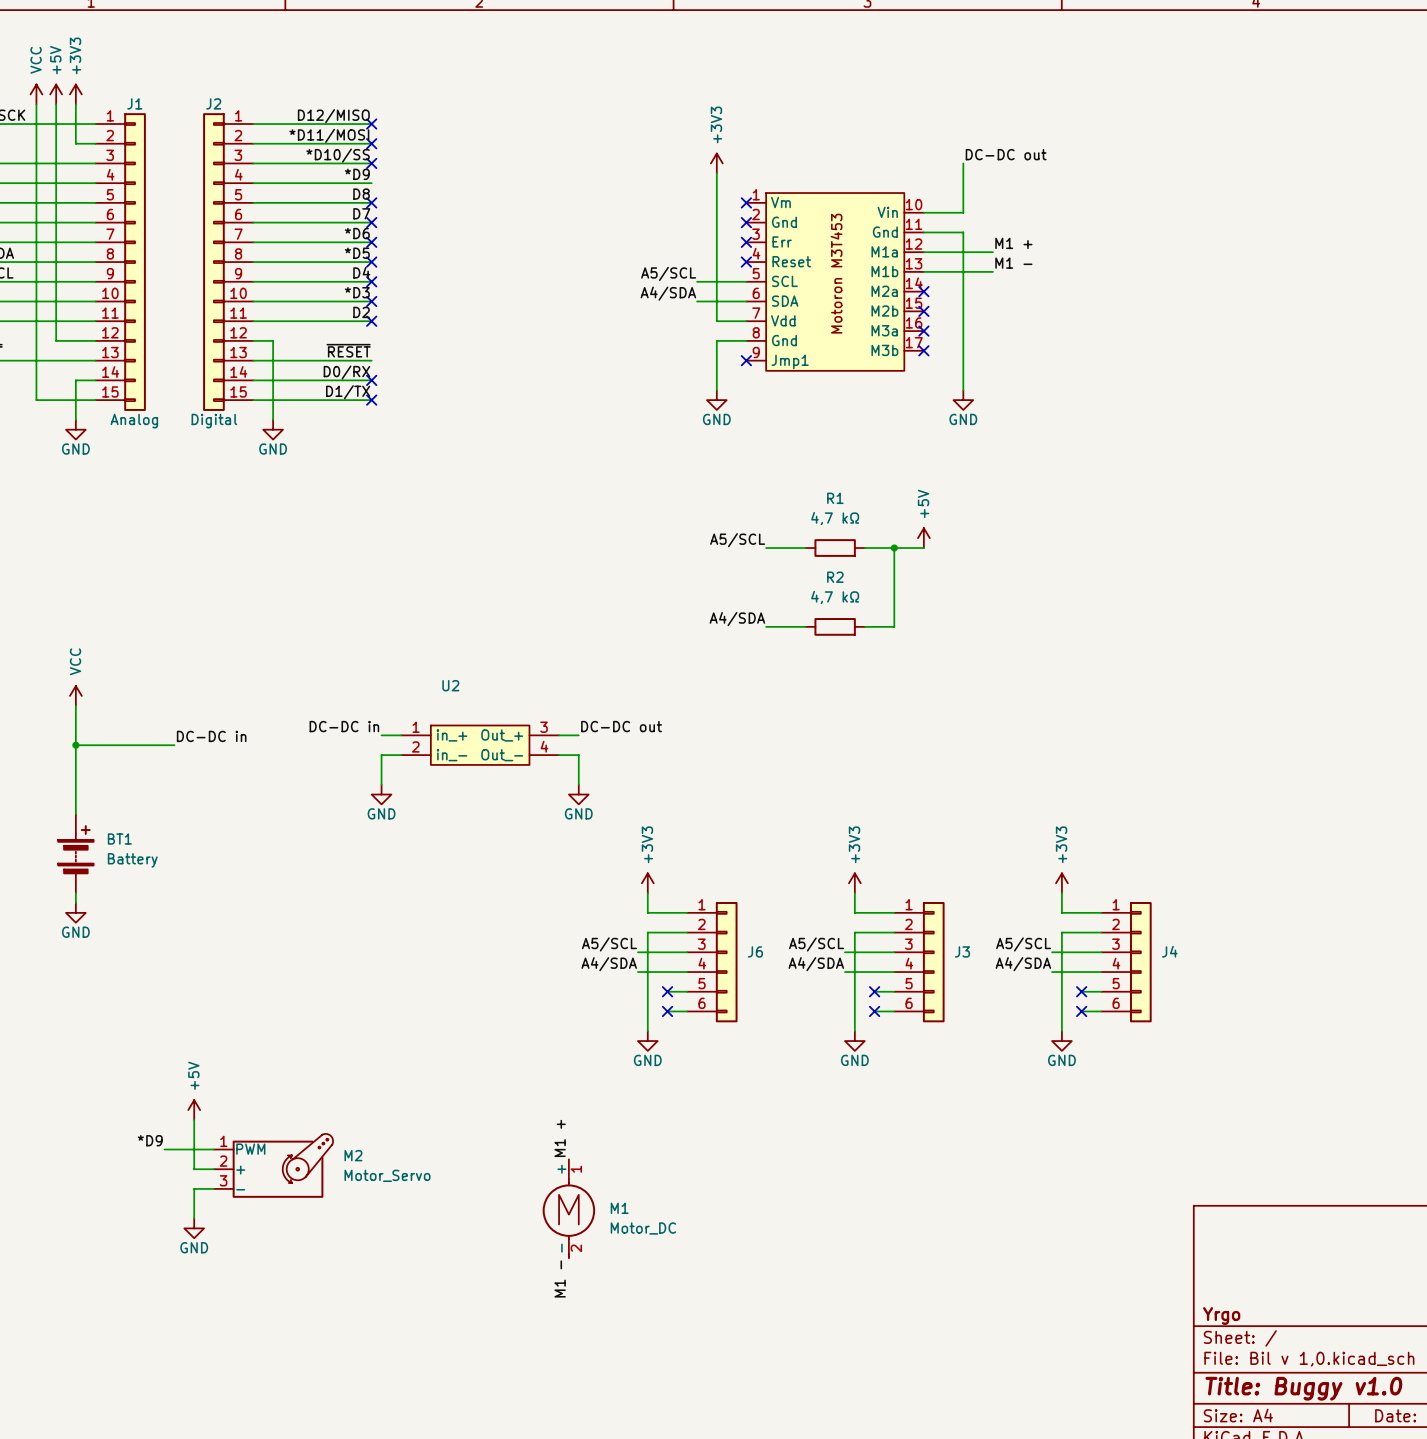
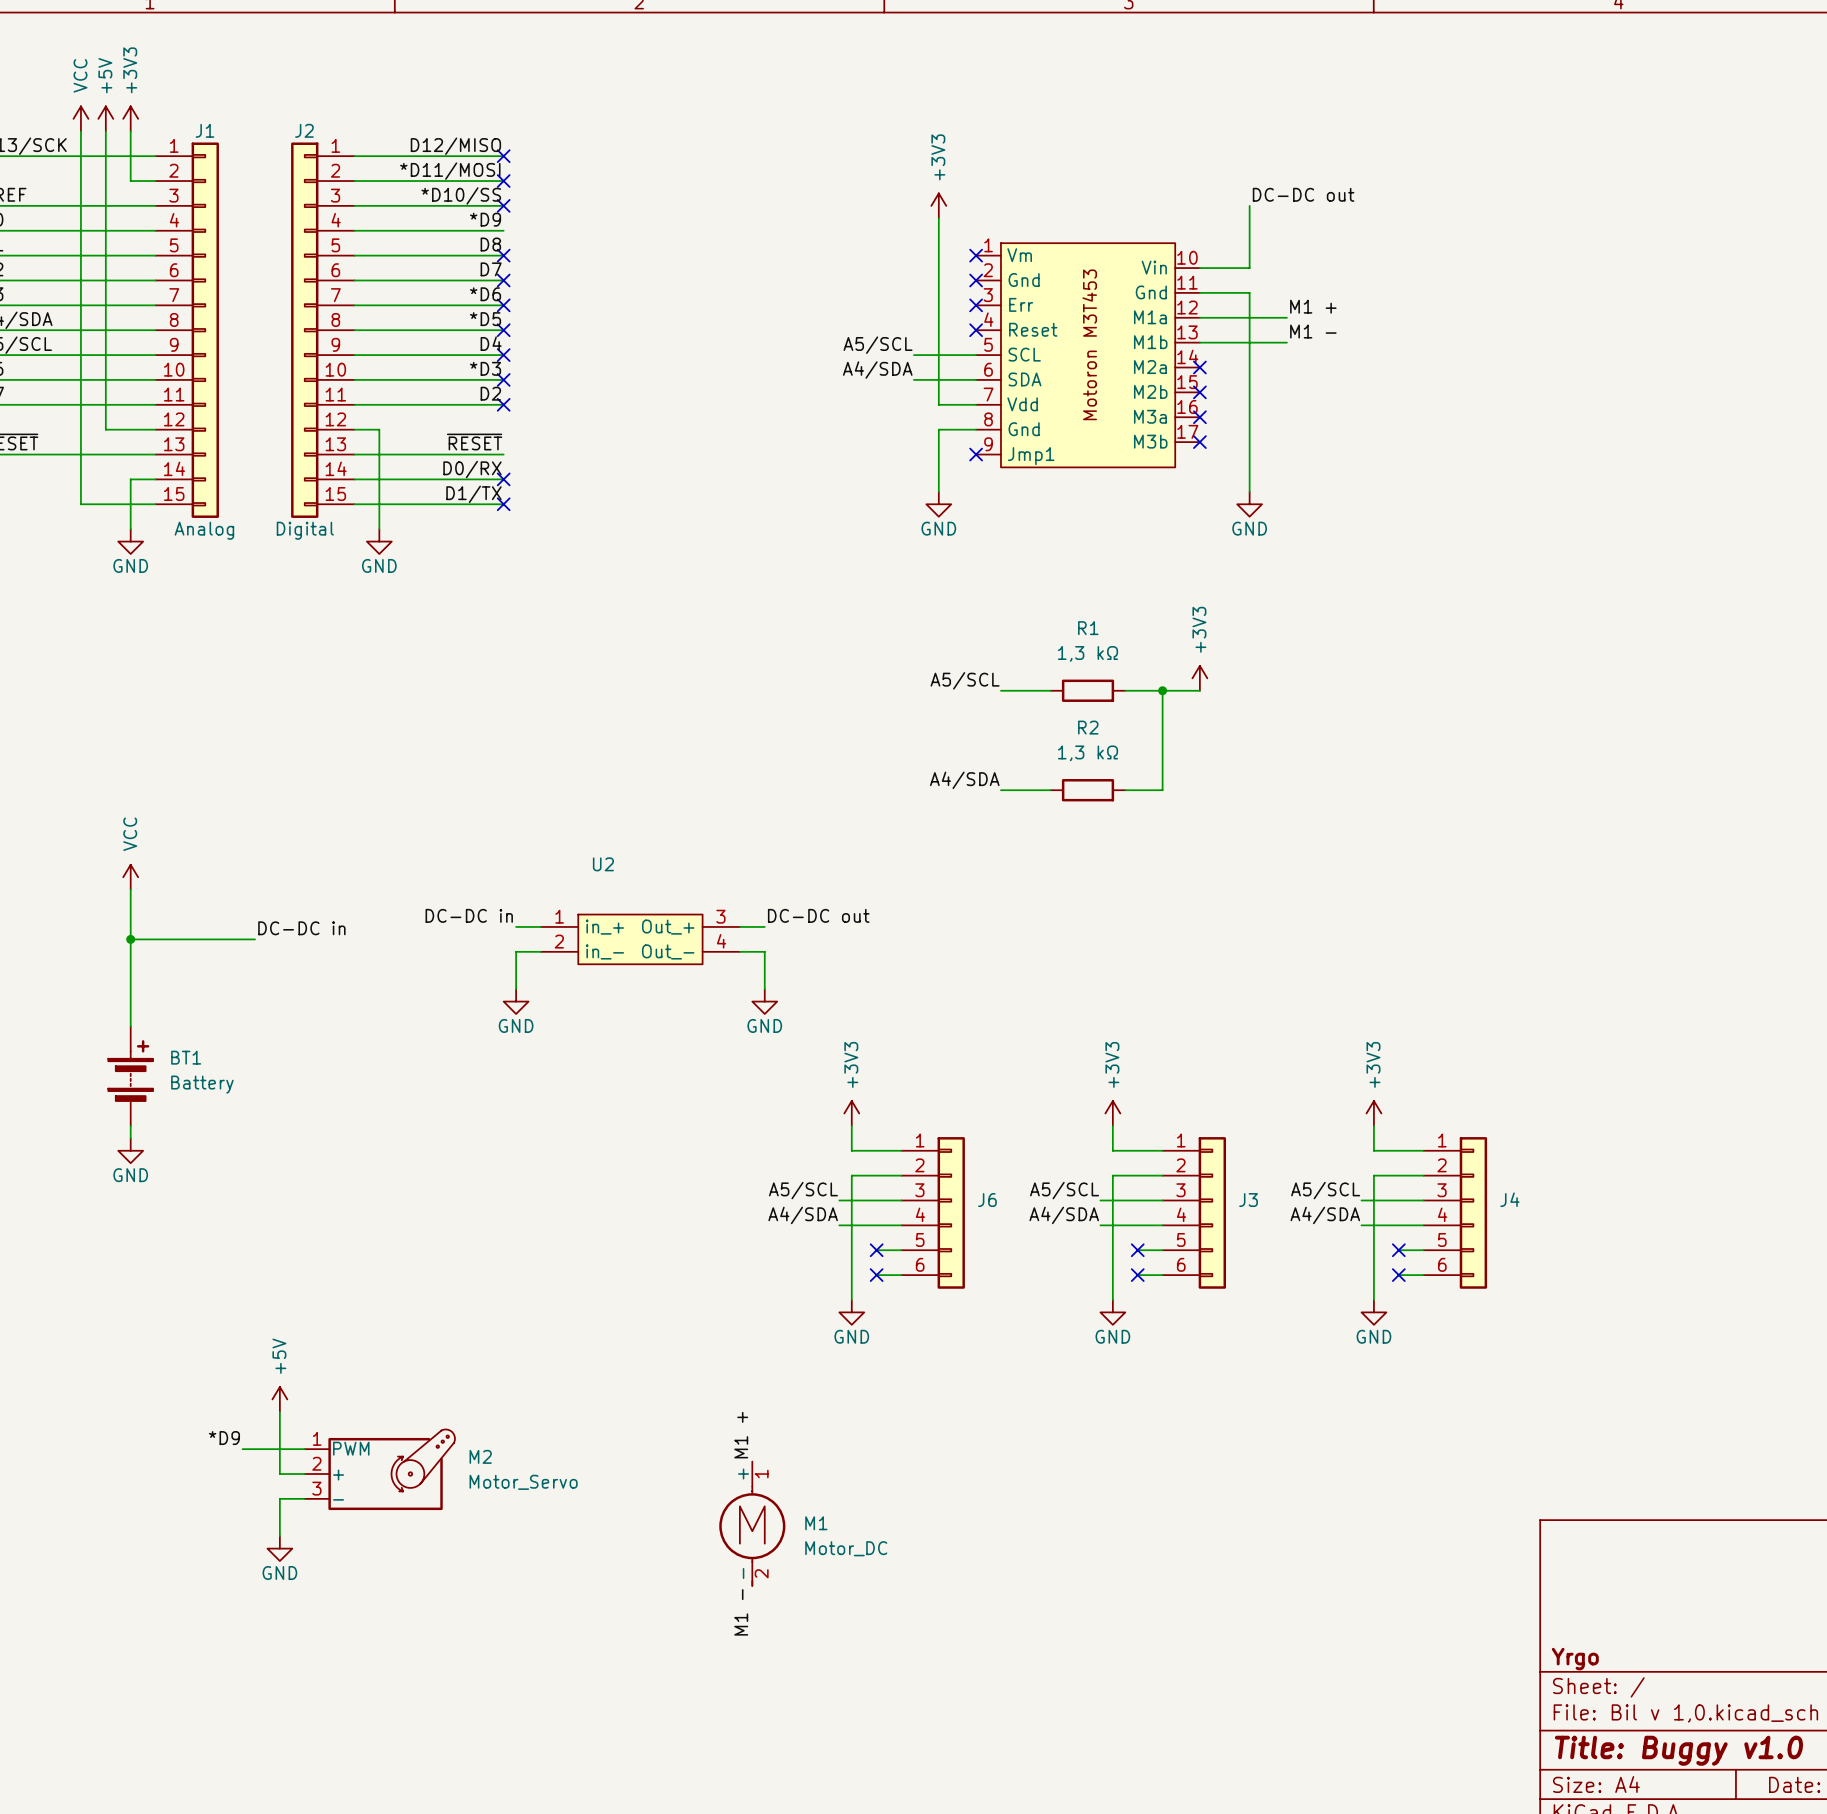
R1 value: 4,7 kΩ (835, 518) -> 1,3 kΩ (1088, 653)
power symbol: +5V (923, 538) -> +3V3 (1199, 678)
R2 value: 4,7 kΩ (835, 597) -> 1,3 kΩ (1088, 753)

